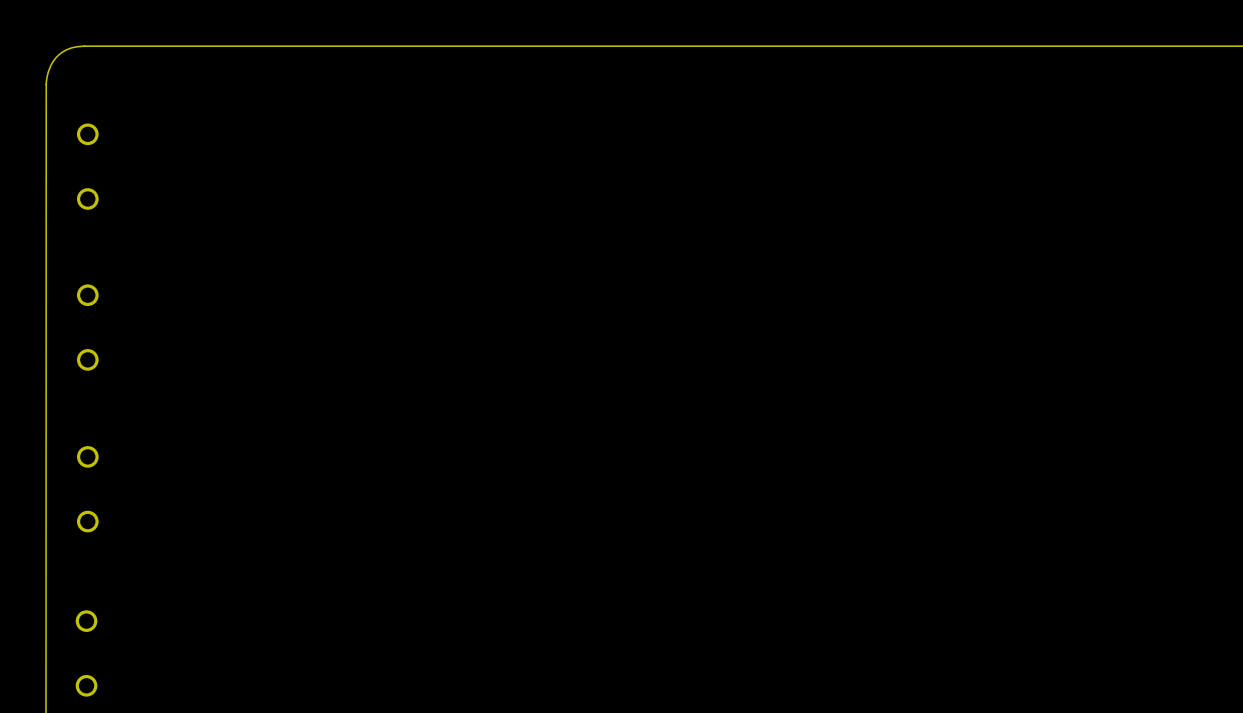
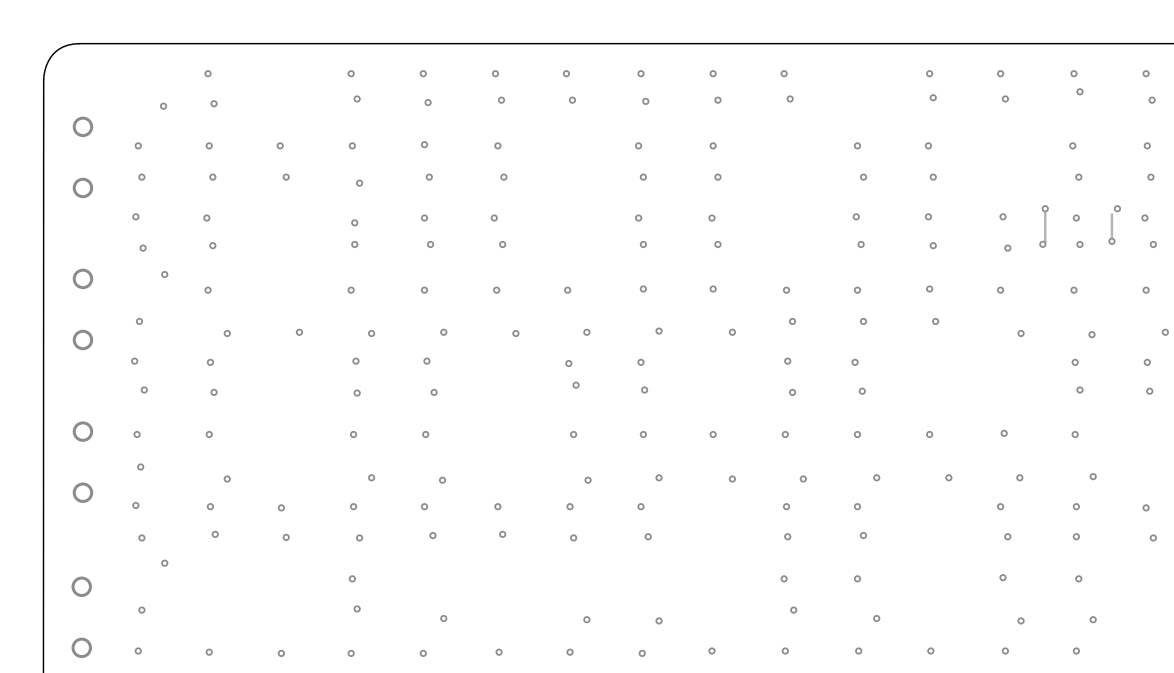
via: none -> (208, 73)
via: none -> (351, 73)
via: none -> (423, 73)
via: none -> (495, 73)
via: none -> (566, 73)
via: none -> (640, 73)
via: none -> (713, 73)
via: none -> (784, 73)
via: none -> (929, 73)
via: none -> (1000, 73)
via: none -> (1073, 73)
via: none -> (1146, 73)
via: none -> (1079, 91)
via: none -> (933, 97)
via: none -> (357, 98)
via: none -> (790, 98)
via: none -> (1005, 98)
via: none -> (501, 100)
via: none -> (572, 100)
via: none -> (717, 100)
via: none -> (1152, 100)
via: none -> (645, 101)
via: none -> (428, 102)
via: none -> (214, 103)
via: none -> (163, 106)
via: none -> (424, 144)
via: none -> (138, 145)
via: none -> (209, 145)
via: none -> (280, 145)
via: none -> (352, 145)
via: none -> (497, 145)
via: none -> (638, 145)
via: none -> (713, 145)
via: none -> (857, 145)
via: none -> (928, 145)
via: none -> (1072, 145)
via: none -> (1147, 145)
via: none -> (141, 177)
via: none -> (212, 177)
via: none -> (286, 177)
via: none -> (429, 177)
via: none -> (503, 177)
via: none -> (643, 177)
via: none -> (717, 177)
via: none -> (863, 177)
via: none -> (933, 177)
via: none -> (1078, 177)
via: none -> (1150, 177)
via: none -> (359, 183)
track: none -> (1045, 208) (1045, 241) (1042, 244)
via: none -> (1045, 208)
via: none -> (1117, 208)
track: none -> (1111, 214) (1111, 241)
via: none -> (135, 216)
via: none -> (856, 216)
via: none -> (928, 216)
via: none -> (1003, 216)
via: none -> (206, 218)
via: none -> (424, 218)
via: none -> (494, 218)
via: none -> (638, 218)
via: none -> (711, 218)
via: none -> (1076, 218)
via: none -> (1144, 218)
via: none -> (354, 222)
via: none -> (1111, 241)
via: none -> (354, 244)
via: none -> (430, 244)
via: none -> (502, 244)
via: none -> (643, 244)
via: none -> (717, 244)
via: none -> (861, 244)
via: none -> (1042, 244)
via: none -> (1079, 244)
via: none -> (1153, 244)
via: none -> (212, 245)
via: none -> (933, 245)
via: none -> (143, 248)
via: none -> (1007, 248)
via: none -> (164, 274)
via: none -> (643, 288)
via: none -> (713, 288)
via: none -> (929, 288)
via: none -> (208, 290)
via: none -> (351, 290)
via: none -> (424, 290)
via: none -> (496, 290)
via: none -> (567, 290)
via: none -> (786, 290)
via: none -> (857, 290)
via: none -> (1000, 290)
via: none -> (1073, 290)
via: none -> (1146, 290)
via: none -> (139, 321)
via: none -> (792, 321)
via: none -> (863, 321)
via: none -> (935, 321)
via: none -> (659, 331)
via: none -> (299, 332)
via: none -> (443, 332)
via: none -> (586, 332)
via: none -> (732, 332)
via: none -> (1165, 332)
via: none -> (227, 333)
via: none -> (371, 333)
via: none -> (515, 333)
via: none -> (1021, 333)
via: none -> (1092, 334)
via: none -> (134, 361)
via: none -> (355, 361)
via: none -> (426, 361)
via: none -> (787, 361)
via: none -> (210, 362)
via: none -> (640, 362)
via: none -> (855, 362)
via: none -> (1075, 362)
via: none -> (1147, 362)
via: none -> (568, 363)
via: none -> (576, 385)
via: none -> (144, 390)
via: none -> (644, 390)
via: none -> (1079, 390)
via: none -> (862, 391)
via: none -> (1149, 391)
via: none -> (214, 392)
via: none -> (434, 392)
via: none -> (792, 392)
via: none -> (357, 393)
via: none -> (1004, 433)
via: none -> (137, 434)
via: none -> (209, 434)
via: none -> (353, 434)
via: none -> (425, 434)
via: none -> (573, 434)
via: none -> (643, 434)
via: none -> (713, 434)
via: none -> (785, 434)
via: none -> (857, 434)
via: none -> (929, 434)
via: none -> (1075, 434)
via: none -> (140, 466)
via: none -> (1093, 476)
via: none -> (371, 477)
via: none -> (659, 477)
via: none -> (876, 477)
via: none -> (948, 477)
via: none -> (1019, 477)
via: none -> (227, 479)
via: none -> (732, 479)
via: none -> (803, 479)
via: none -> (442, 480)
via: none -> (588, 480)
via: none -> (135, 505)
via: none -> (210, 506)
via: none -> (353, 506)
via: none -> (424, 506)
via: none -> (497, 506)
via: none -> (570, 506)
via: none -> (640, 506)
via: none -> (786, 506)
via: none -> (857, 506)
via: none -> (1000, 506)
via: none -> (1076, 506)
via: none -> (281, 507)
via: none -> (1146, 507)
via: none -> (215, 534)
via: none -> (502, 534)
via: none -> (432, 535)
via: none -> (863, 535)
via: none -> (286, 537)
via: none -> (648, 536)
via: none -> (787, 536)
via: none -> (1007, 536)
via: none -> (1076, 536)
via: none -> (141, 537)
via: none -> (359, 537)
via: none -> (573, 537)
via: none -> (1153, 537)
via: none -> (164, 563)
via: none -> (1003, 577)
via: none -> (352, 578)
via: none -> (784, 578)
via: none -> (857, 578)
via: none -> (1078, 578)
via: none -> (357, 608)
via: none -> (141, 610)
via: none -> (793, 610)
via: none -> (443, 618)
via: none -> (876, 618)
via: none -> (586, 619)
via: none -> (1093, 619)
via: none -> (659, 620)
via: none -> (1021, 620)
via: none -> (138, 651)
via: none -> (711, 651)
via: none -> (785, 651)
via: none -> (858, 651)
via: none -> (930, 651)
via: none -> (1005, 651)
via: none -> (1076, 651)
via: none -> (209, 652)
via: none -> (499, 652)
via: none -> (570, 652)
via: none -> (281, 653)
via: none -> (351, 653)
via: none -> (423, 653)
via: none -> (642, 653)

